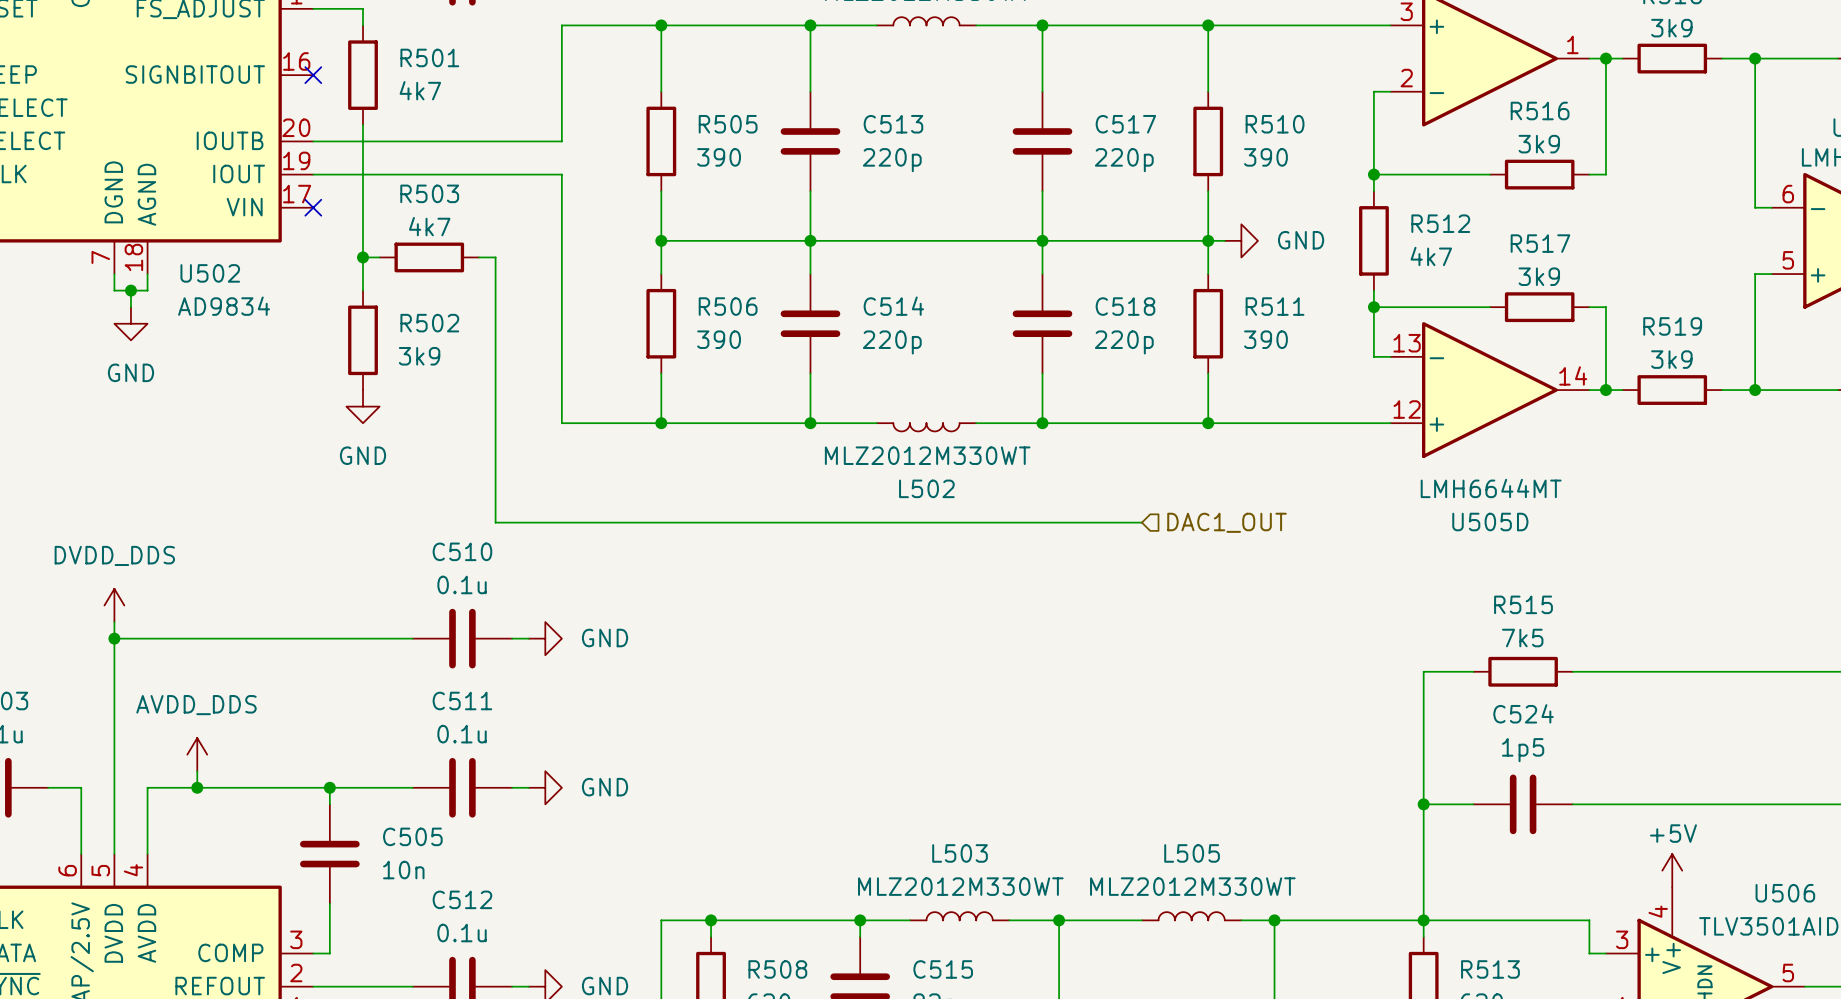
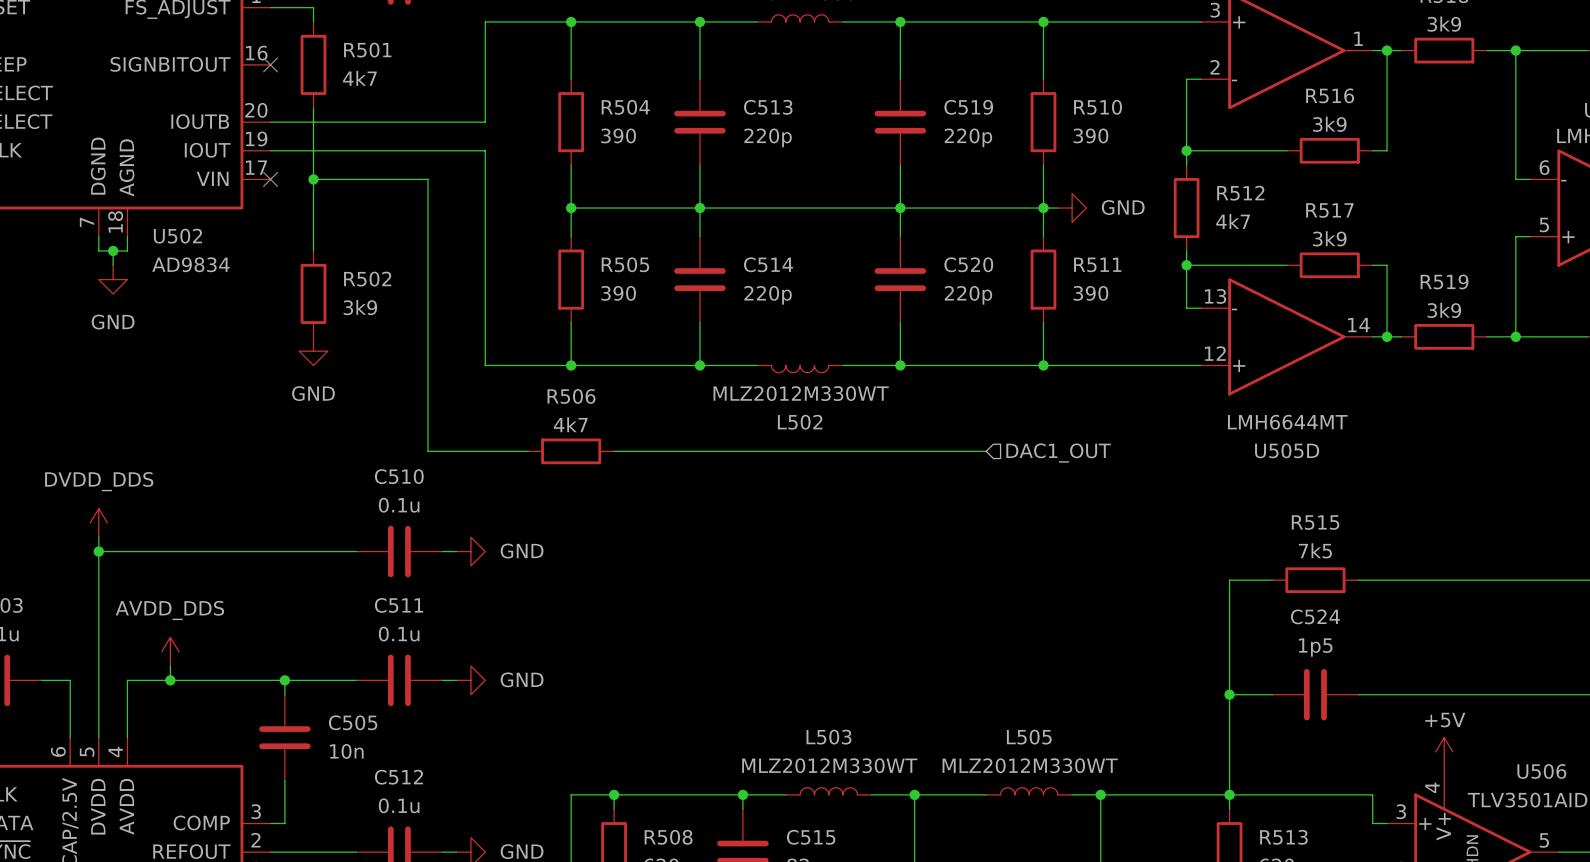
R505 name: R505 (728, 124) -> R504 (625, 107)
C517 name: C517 (1125, 124) -> C519 (968, 107)
wire: (363, 257) (379, 257) -> none
junction position: (363, 257) -> (313, 179)
R503: 4k7 (429, 257) -> none
wire: (479, 257) (495, 257) -> (313, 179) (428, 179) (428, 222)
R506 name: R506 (728, 306) -> R505 (625, 264)
C518 name: C518 (1125, 306) -> C520 (968, 264)
wire: (611, 522) (711, 522) -> none
R506: none -> 4k7 (571, 451)

